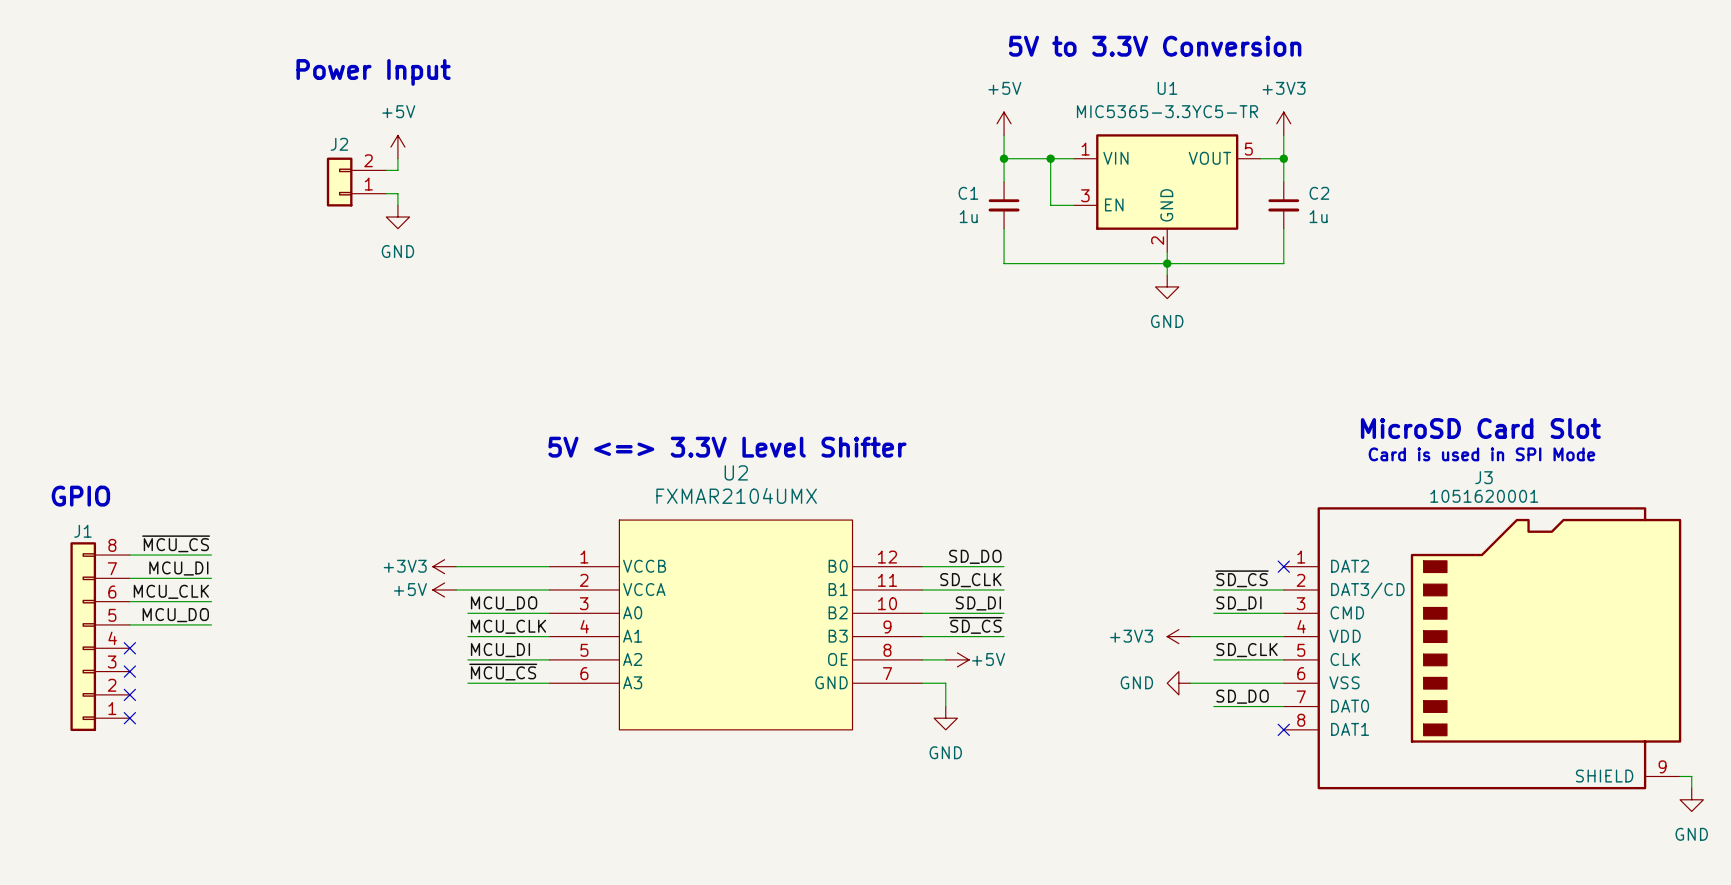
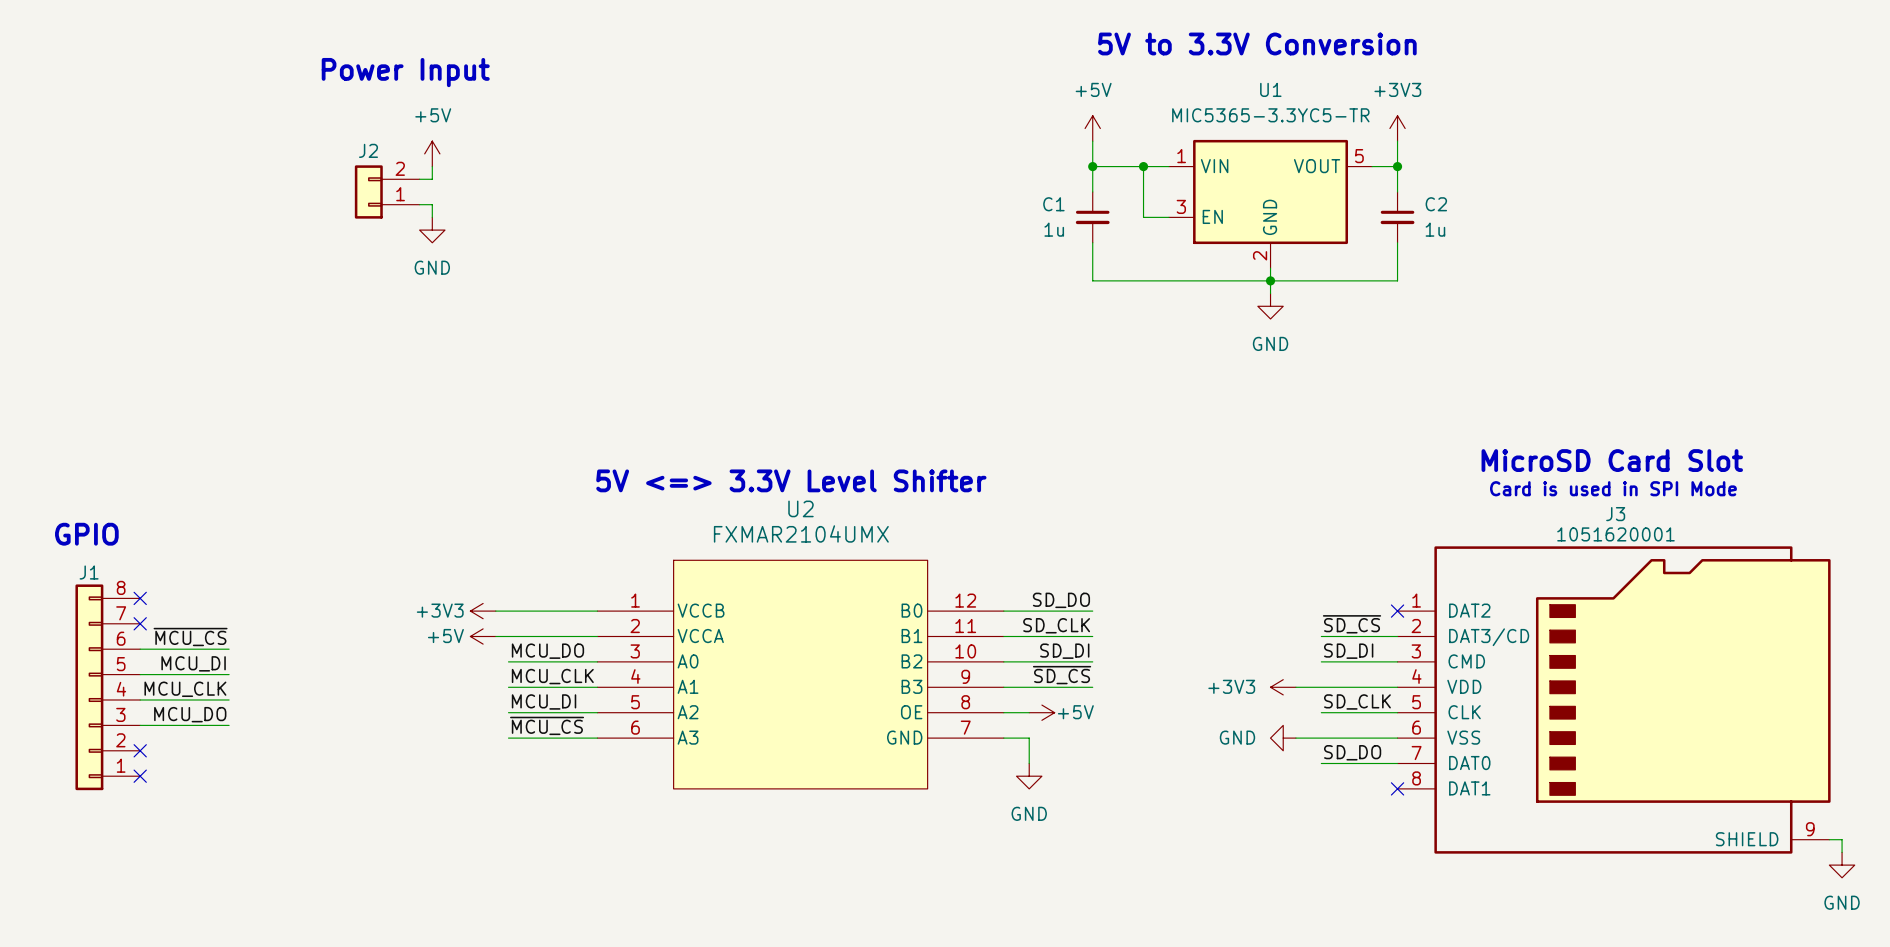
label: ~{MCU_CS} (176, 543) -> none
wire: (129, 555) (211, 555) -> (140, 725) (229, 725)
no-connect mark: none -> (140, 598)
label: MCU_DI (178, 568) -> none
wire: (129, 578) (211, 578) -> (140, 699) (229, 699)
no-connect mark: none -> (140, 623)
label: MCU_CLK (171, 591) -> ~{MCU_CS} (190, 637)
label: MCU_DO (175, 615) -> MCU_DI (193, 663)
label: none -> MCU_CLK (185, 689)
no-connect mark: (129, 648) -> none
label: none -> MCU_DO (190, 714)
no-connect mark: (129, 671) -> none

